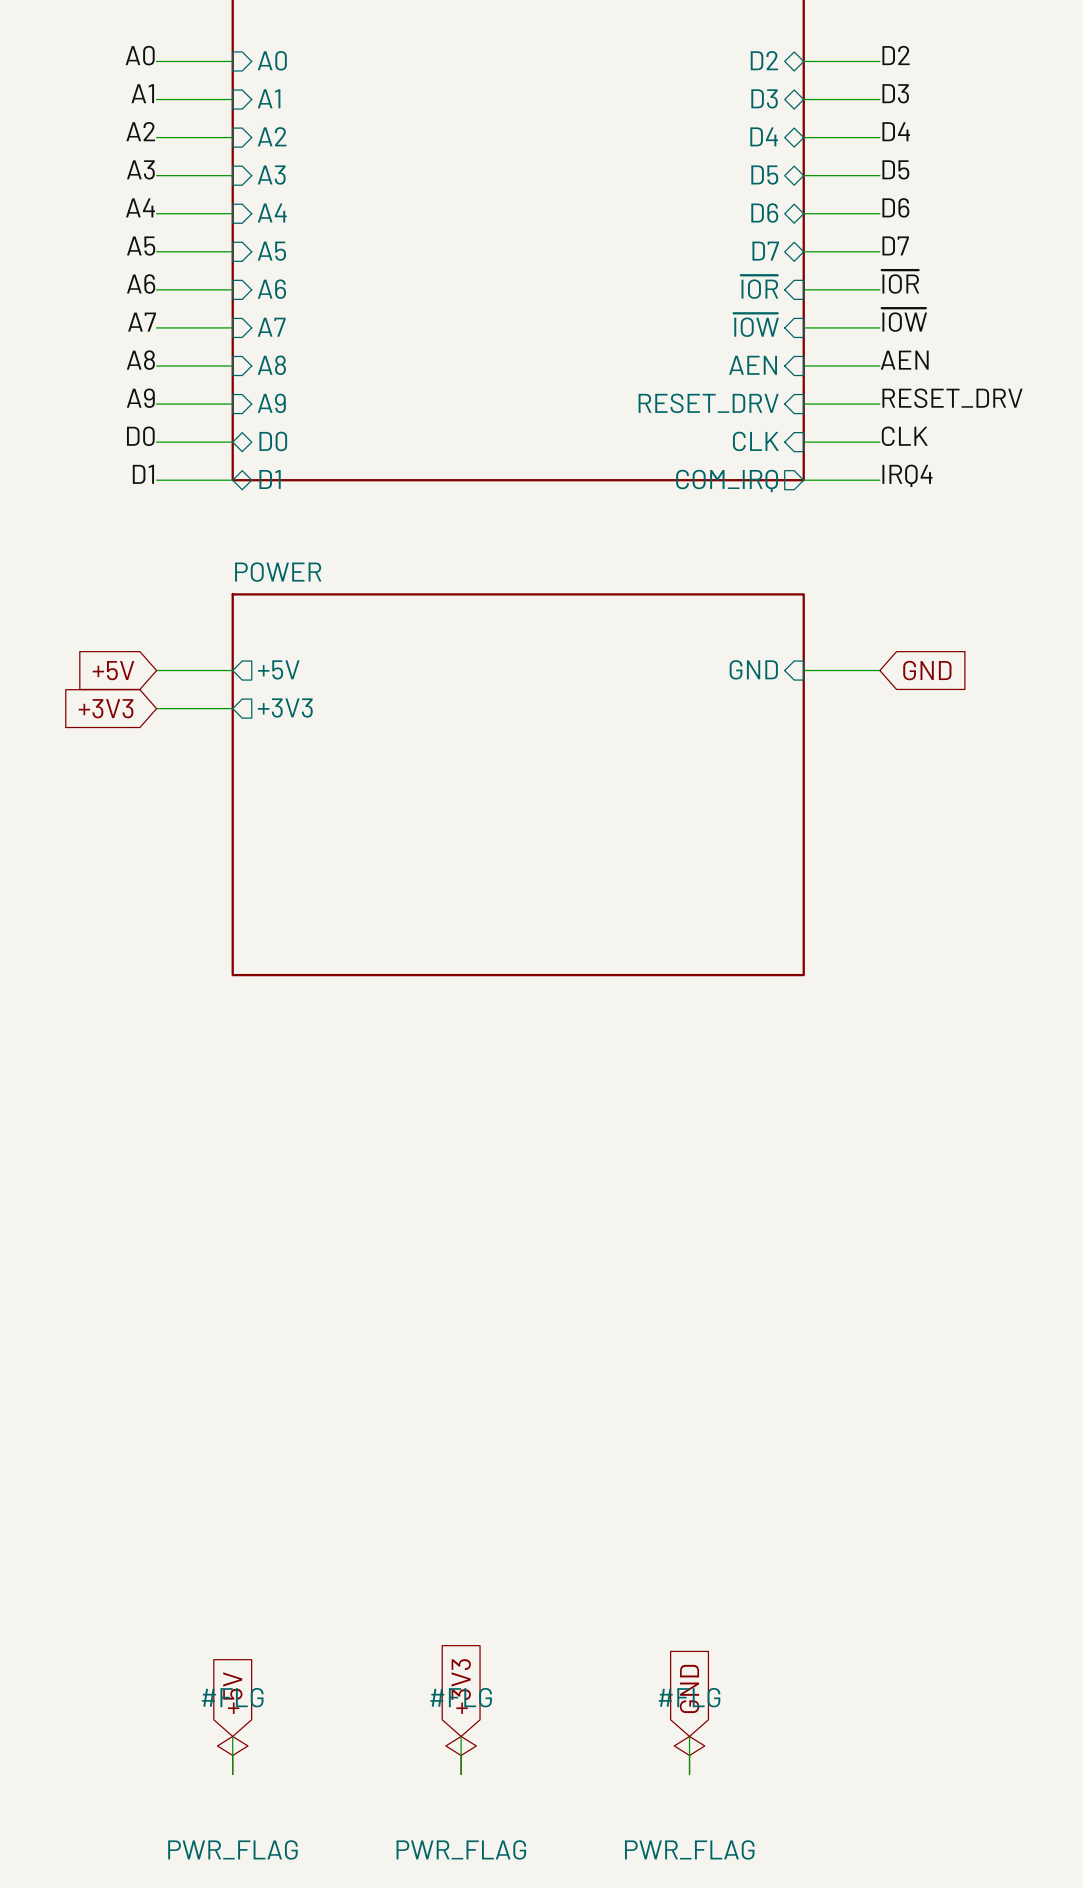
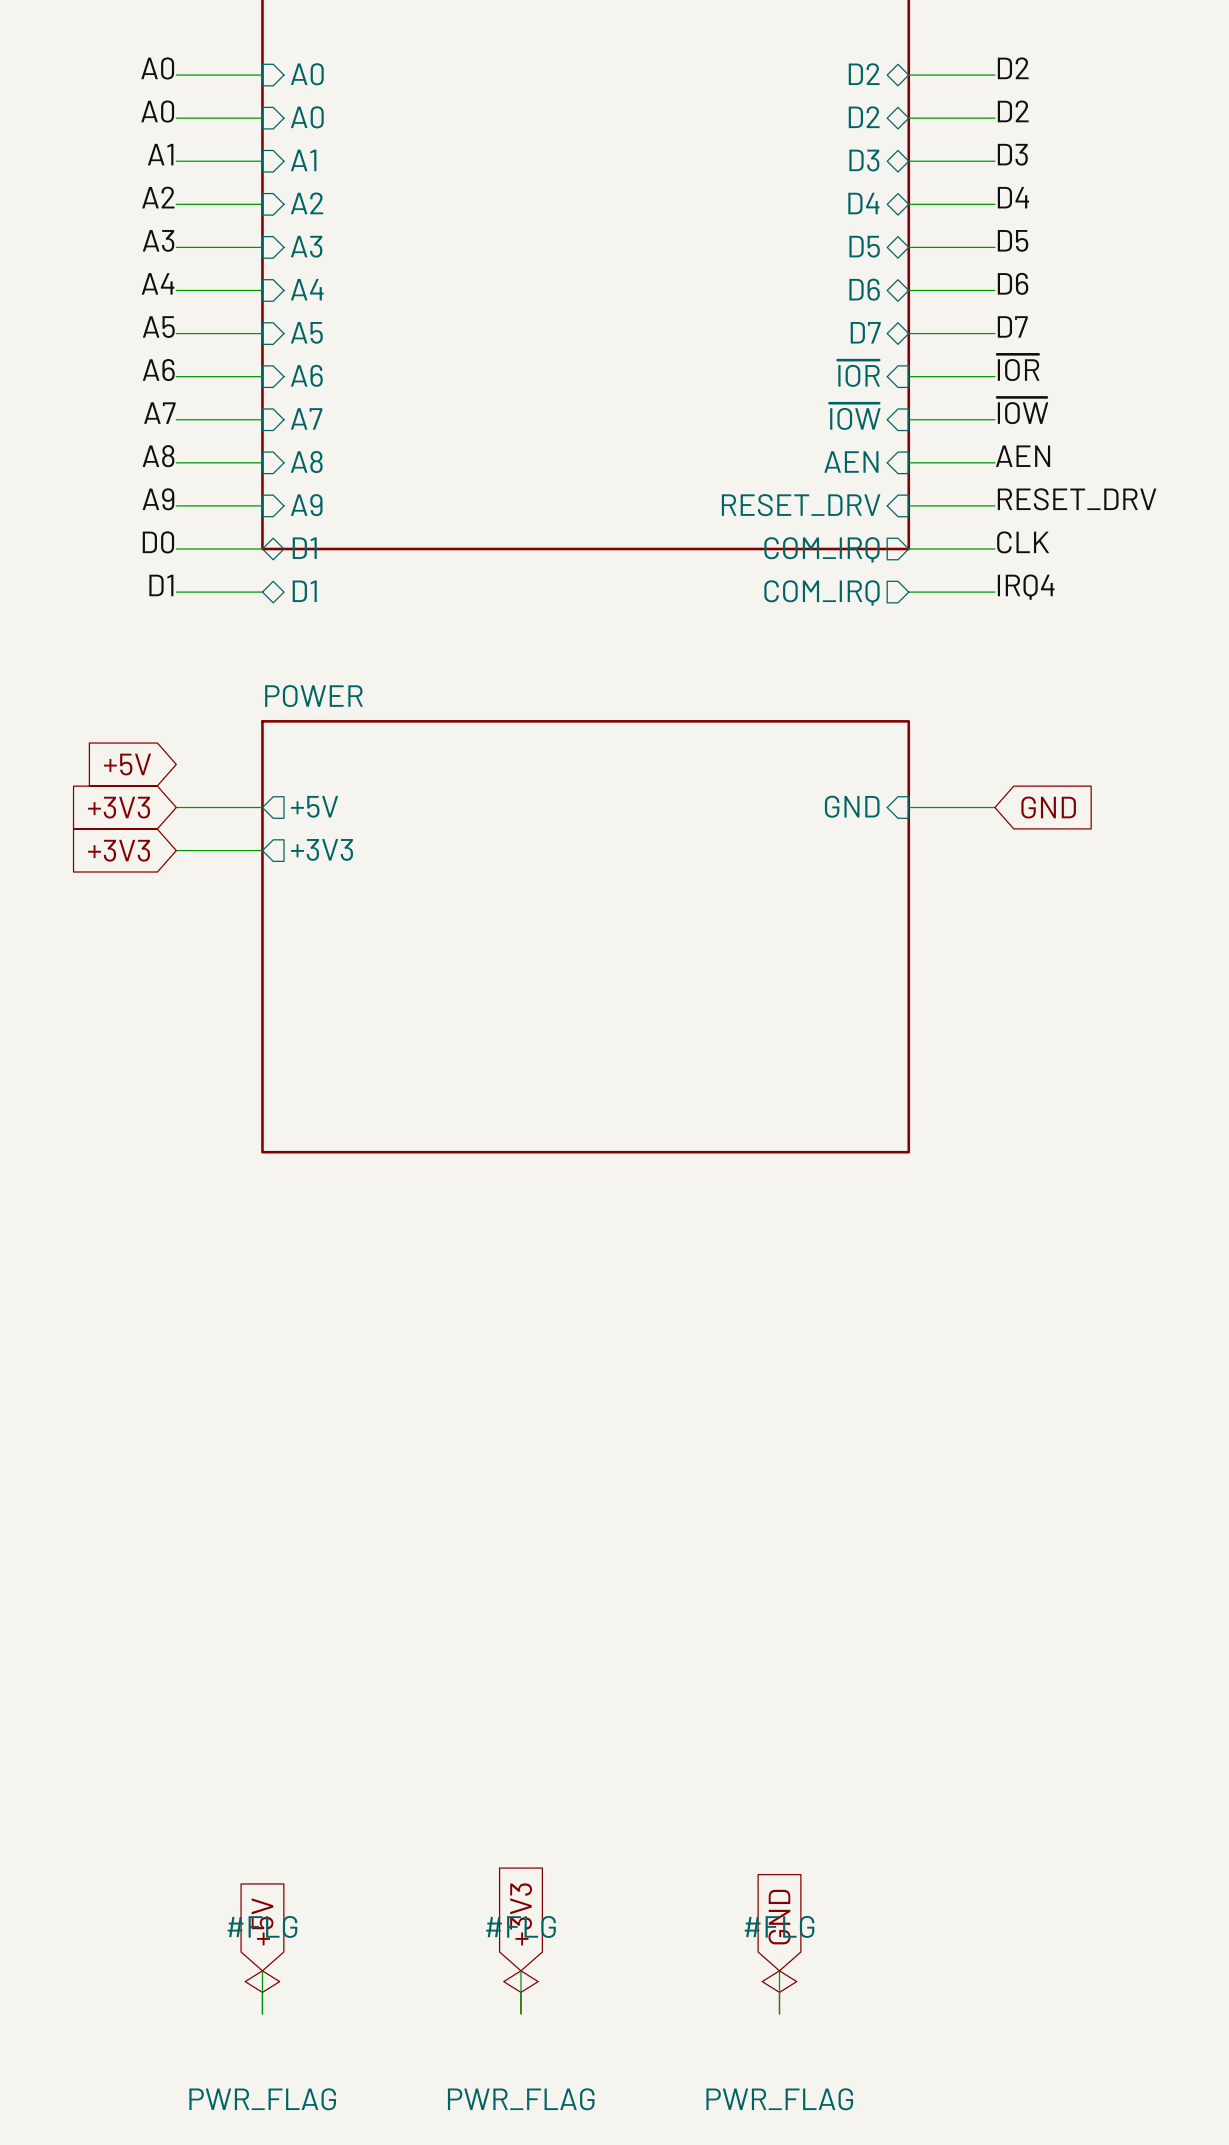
label: A1 (142, 93) -> A0 (157, 111)
label: D3 (895, 93) -> D2 (1013, 111)
sheet pin: A1 (269, 98) -> A0 (307, 117)
sheet pin: D3 (764, 98) -> D2 (864, 117)
label: A2 (140, 131) -> A1 (160, 154)
label: D4 (896, 131) -> D3 (1012, 154)
sheet pin: A2 (272, 136) -> A1 (303, 160)
sheet pin: D4 (764, 136) -> D3 (864, 160)
label: A3 (140, 169) -> A2 (158, 197)
label: D5 (895, 169) -> D4 (1013, 197)
sheet pin: A3 (271, 175) -> A2 (307, 203)
sheet pin: D5 (764, 175) -> D4 (863, 203)
label: A4 (140, 207) -> A3 (158, 240)
label: D6 (895, 207) -> D5 (1013, 240)
sheet pin: A4 (272, 213) -> A3 (306, 246)
sheet pin: D6 (764, 213) -> D5 (864, 246)
label: D7 (895, 245) -> D6 (1013, 283)
label: A5 (141, 246) -> A4 (158, 283)
sheet pin: A5 (271, 251) -> A4 (307, 289)
sheet pin: D7 (765, 251) -> D6 (864, 289)
label: ~{IOR} (900, 281) -> D7 (1012, 326)
label: A6 (141, 284) -> A5 (158, 327)
sheet pin shape: input (759, 287) -> bidirectional (865, 332)
sheet pin: ~{IOR} (759, 287) -> D7 (865, 332)
sheet pin: A6 (271, 289) -> A5 (306, 332)
label: ~{IOW} (904, 320) -> ~{IOR} (1018, 367)
label: A7 (142, 322) -> A6 (158, 370)
sheet pin: ~{IOW} (756, 325) -> ~{IOR} (858, 373)
sheet pin: A7 (271, 327) -> A6 (306, 375)
label: A8 (140, 360) -> A7 (159, 413)
label: AEN (904, 360) -> ~{IOW} (1022, 410)
sheet pin: A8 (271, 365) -> A7 (306, 418)
sheet pin: AEN (753, 365) -> ~{IOW} (854, 416)
label: A9 (140, 398) -> A8 (158, 456)
label: RESET_DRV (952, 398) -> AEN (1023, 456)
sheet pin: A9 (271, 403) -> A8 (306, 461)
sheet pin: RESET_DRV (708, 403) -> AEN (851, 462)
label: D0 (140, 436) -> A9 (158, 499)
label: CLK (904, 436) -> RESET_DRV (1077, 499)
sheet pin shape: bidirectional (273, 441) -> input (306, 505)
sheet pin: D0 (273, 441) -> A9 (306, 505)
sheet pin: CLK (755, 441) -> RESET_DRV (801, 505)
label: D1 (143, 474) -> D0 (158, 542)
label: IRQ4 (907, 475) -> CLK (1023, 542)
label: none -> D1 (161, 585)
label: none -> IRQ4 (1026, 587)
sheet pin: none -> D1 (304, 591)
sheet pin: none -> COM_IRQ (821, 592)
sheet pin: +5V (278, 669) -> none
sheet pin position: GND (753, 669) -> GND (852, 806)
wire: (156, 670) (232, 670) -> (176, 592) (262, 592)
wire: (803, 670) (879, 670) -> (908, 592) (994, 592)
global label position: GND (927, 670) -> GND (1048, 807)
sheet pin: +3V3 (285, 708) -> +5V (314, 806)
wire: none -> (908, 807) (994, 807)
global label: none -> +3V3 (119, 850)
wire: none -> (176, 850) (262, 850)
sheet pin: none -> +3V3 (322, 849)
sheet POWER position: (518, 784) -> (585, 936)

